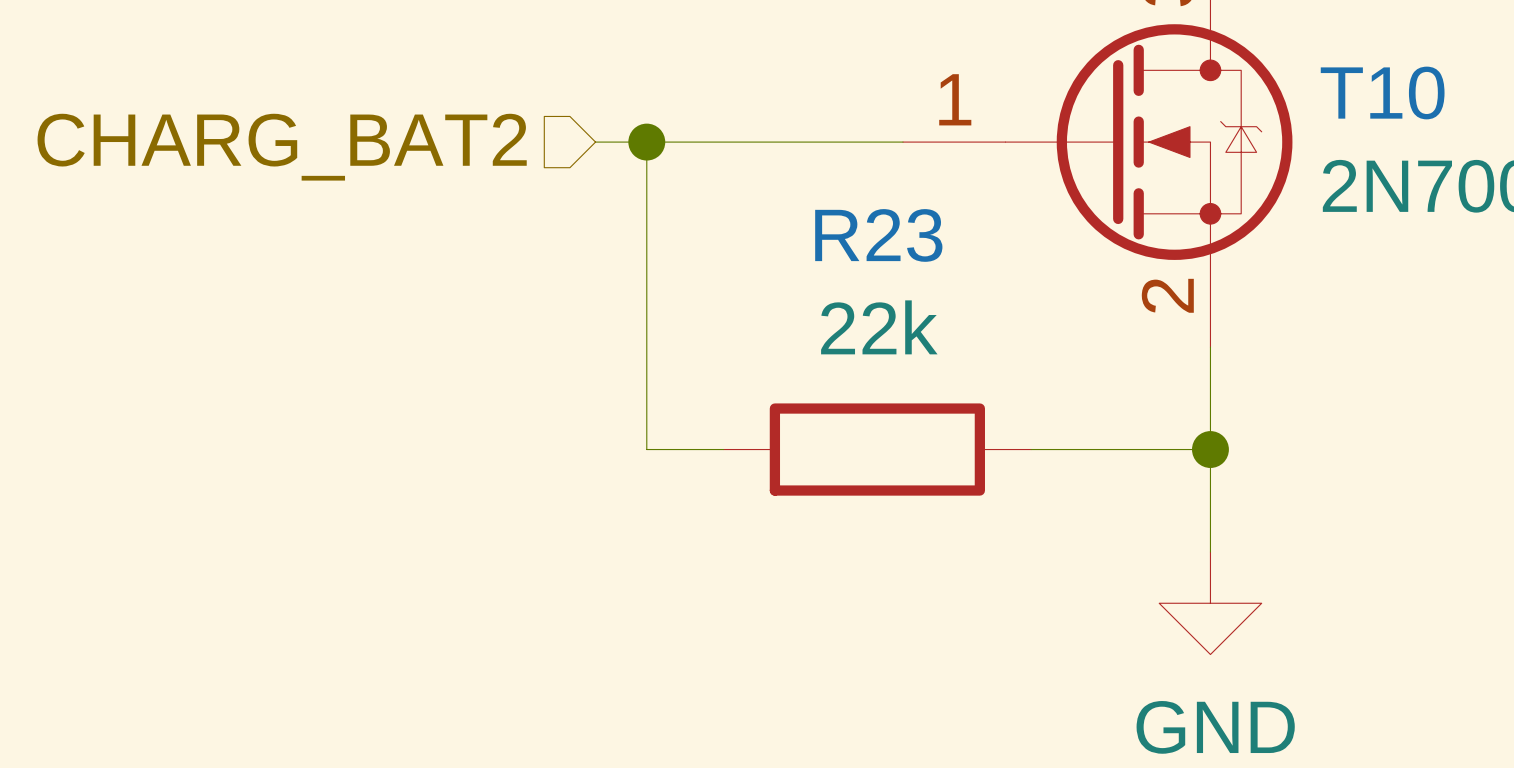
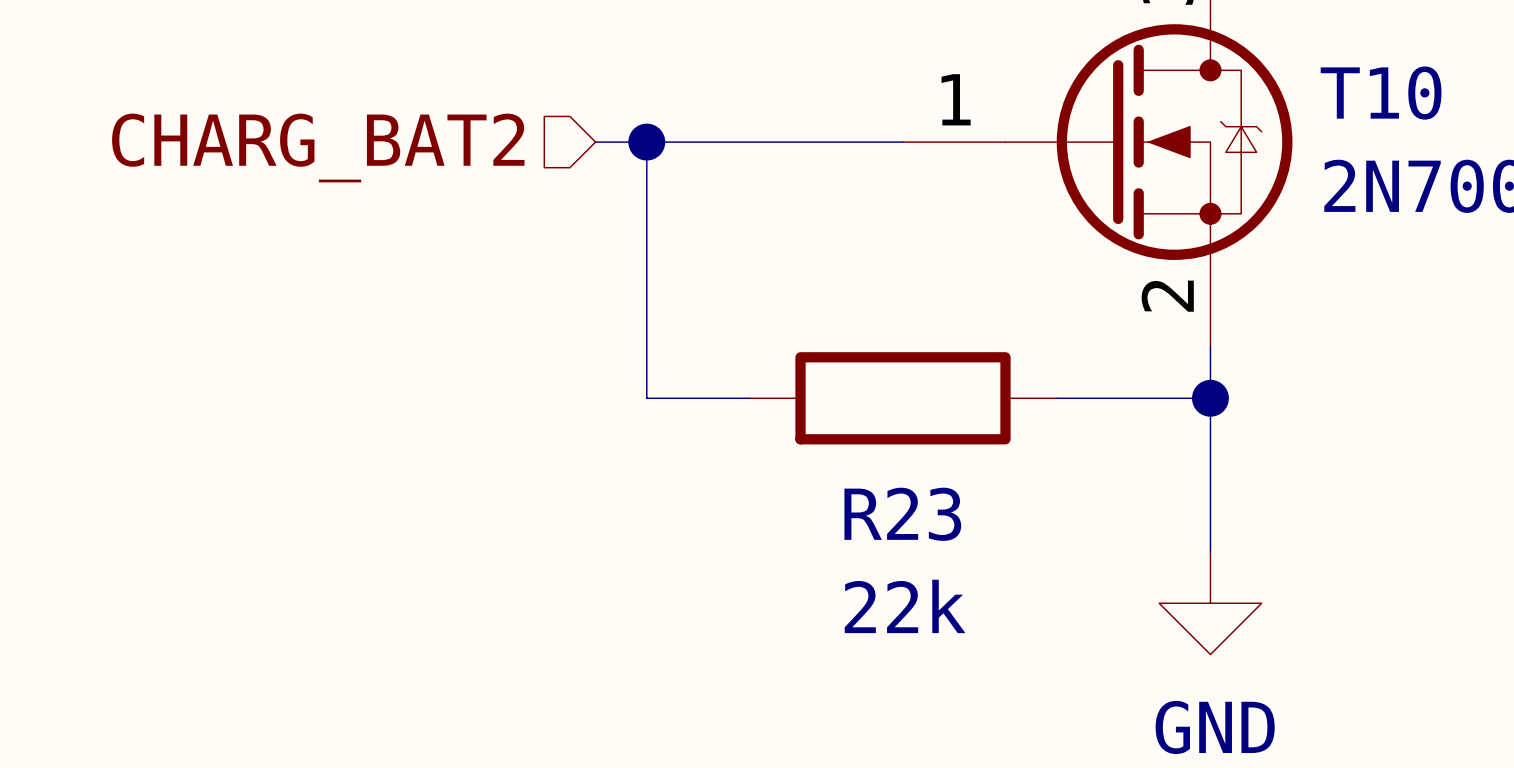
R23 name position: R23 (878, 235) -> R23 (902, 514)
R23 value position: 22k (879, 327) -> 22k (905, 606)
wire: (646, 398) (646, 449) (723, 449) -> (646, 398) (749, 398)
wire: none -> (1056, 398) (1210, 398)
R23 position: (877, 449) -> (903, 398)
wire: (1031, 449) (1210, 449) -> none
junction position: (1210, 449) -> (1210, 398)

